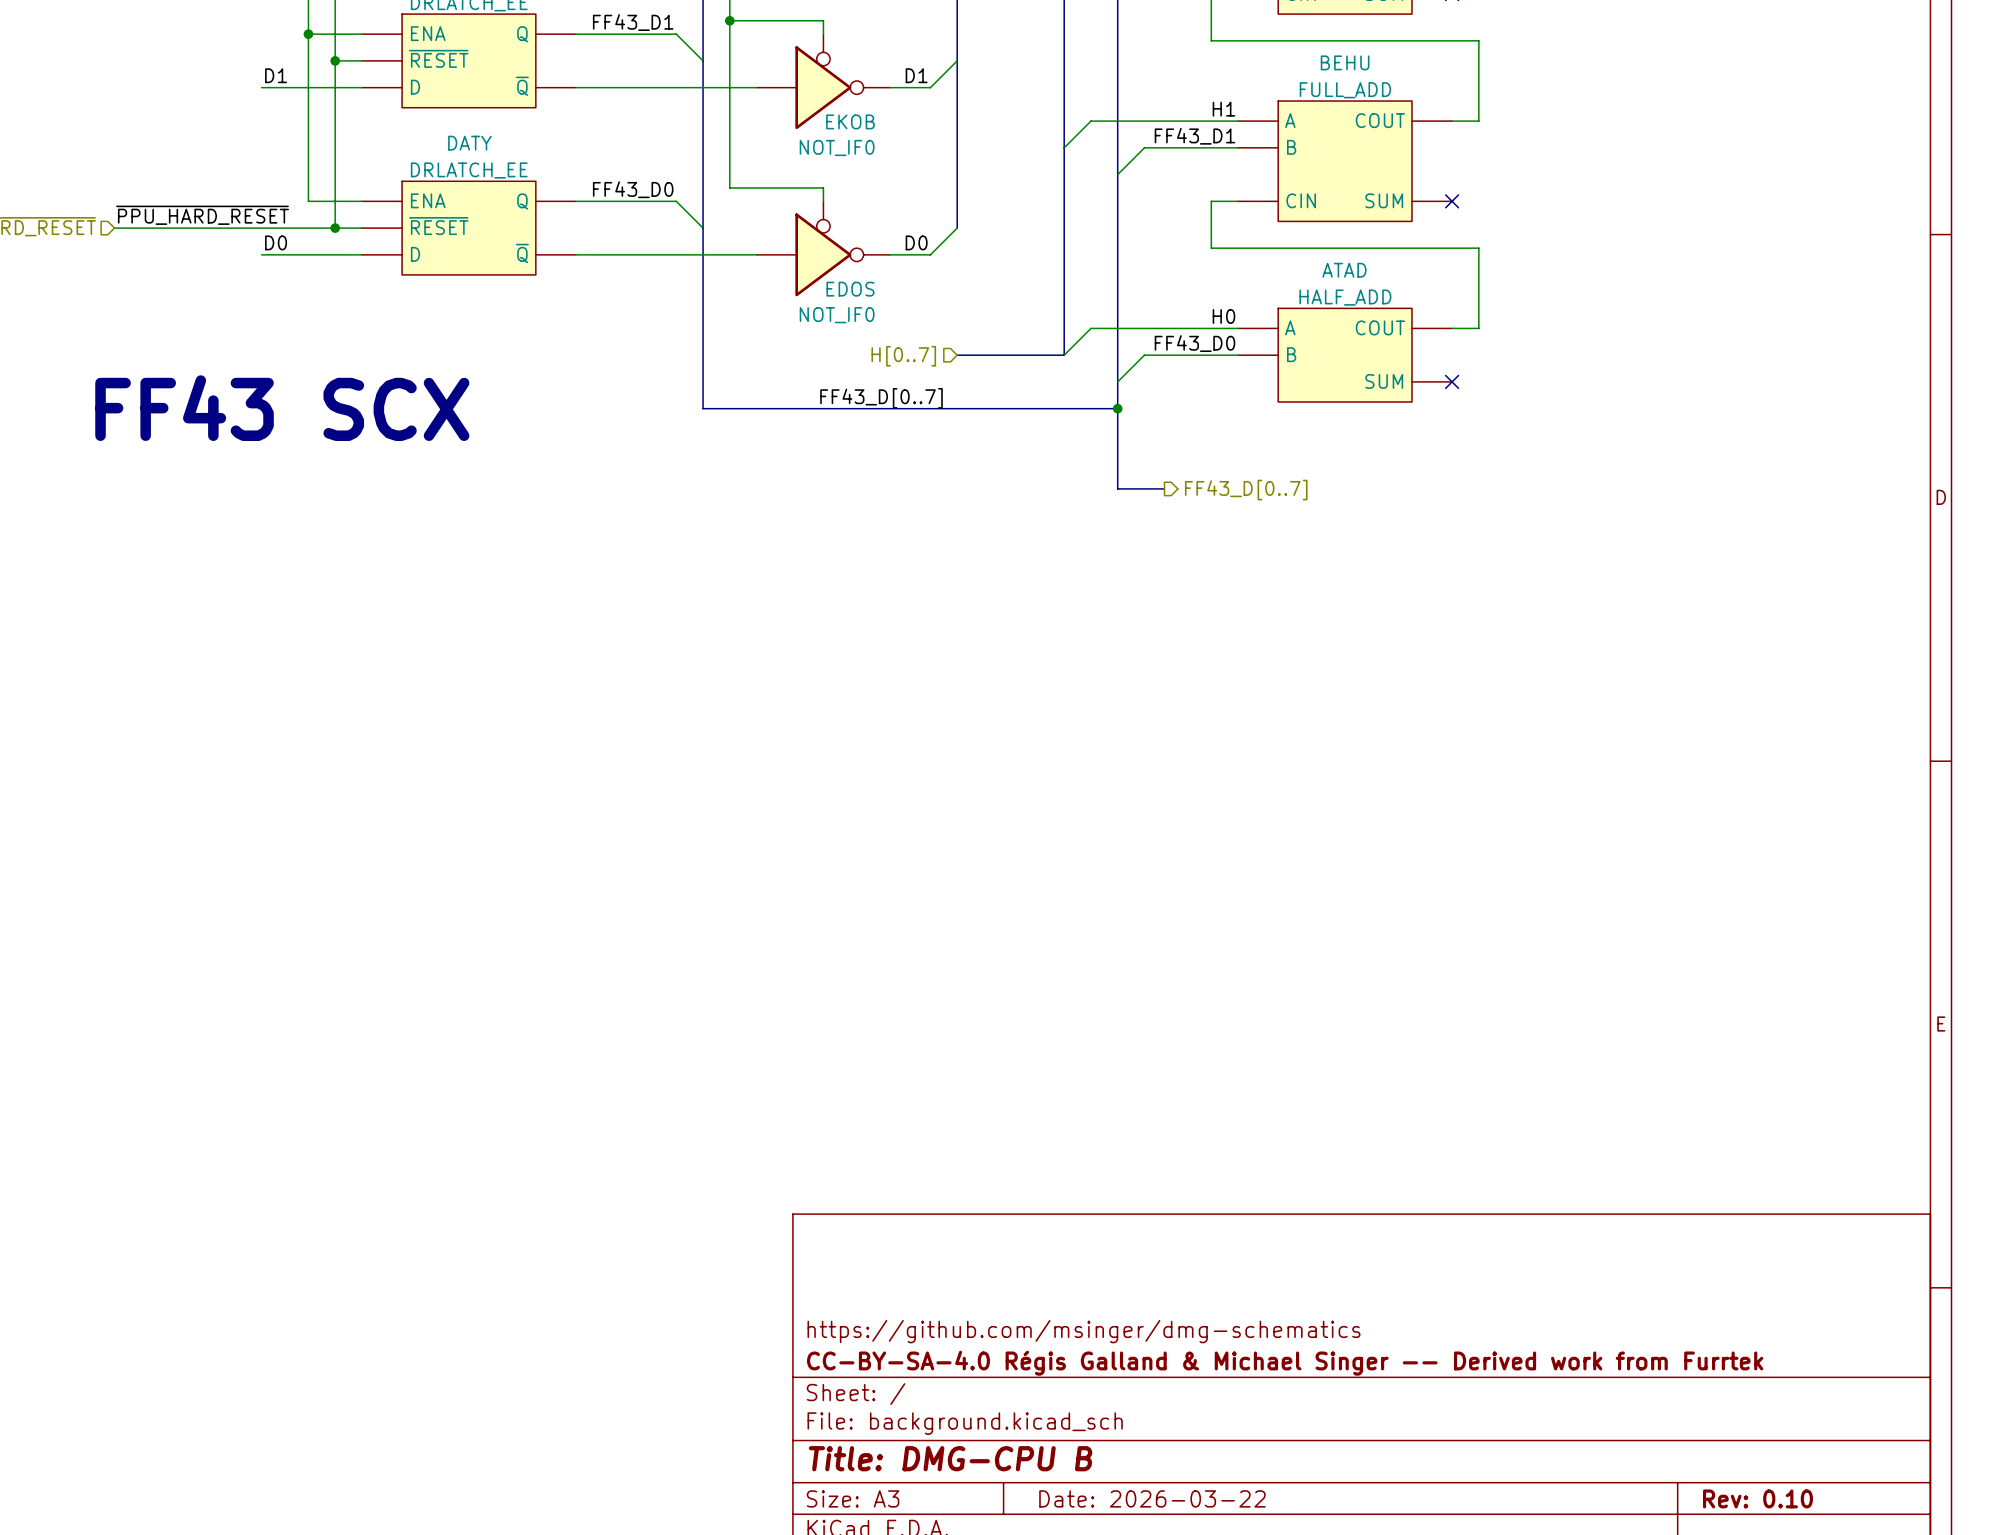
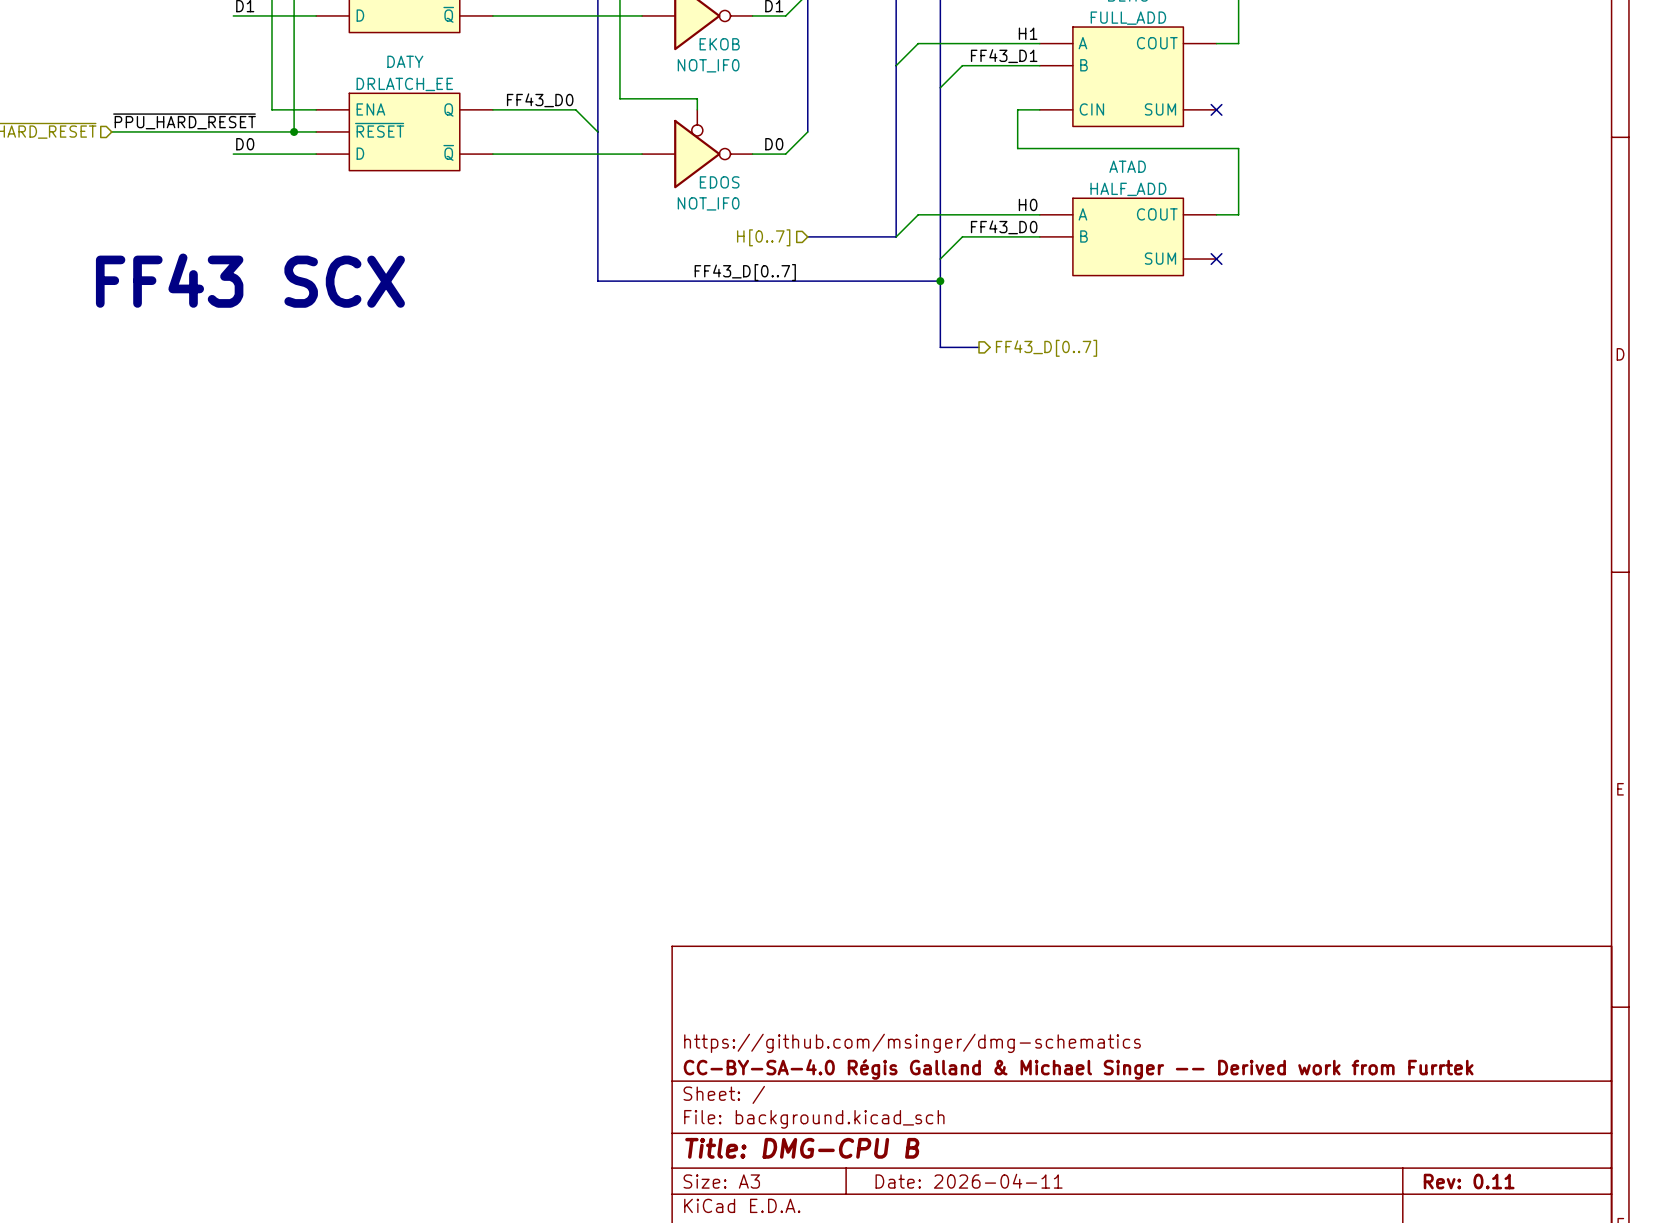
title block: Date: 2026-03-22 (1152, 1498) -> Date: 2026-04-11 (969, 1181)
title block: Rev: 0.10 (1757, 1498) -> Rev: 0.11 (1469, 1181)

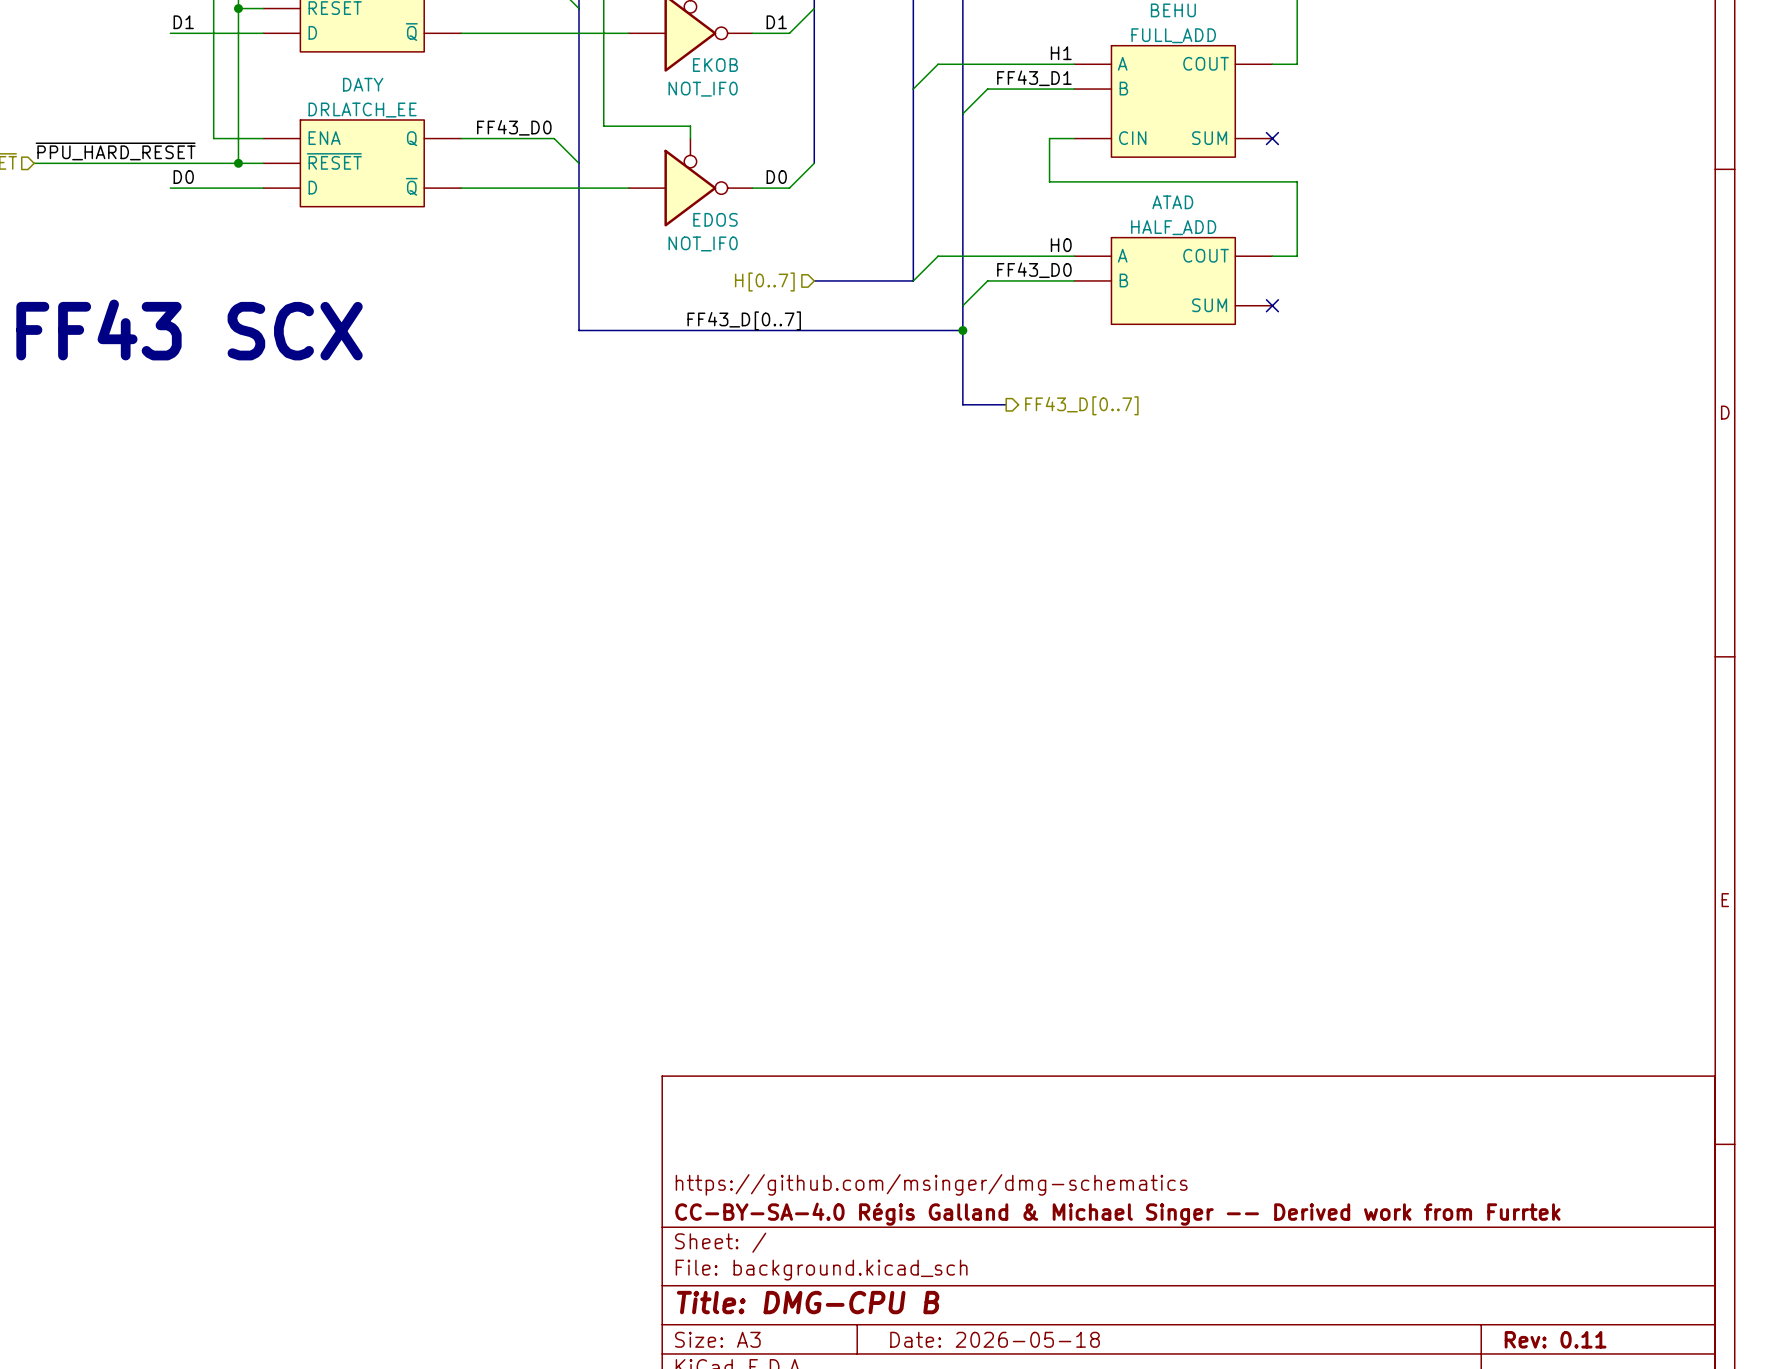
title block: Date: 2026-04-11 (969, 1181) -> Date: 2026-05-18 (995, 1339)

